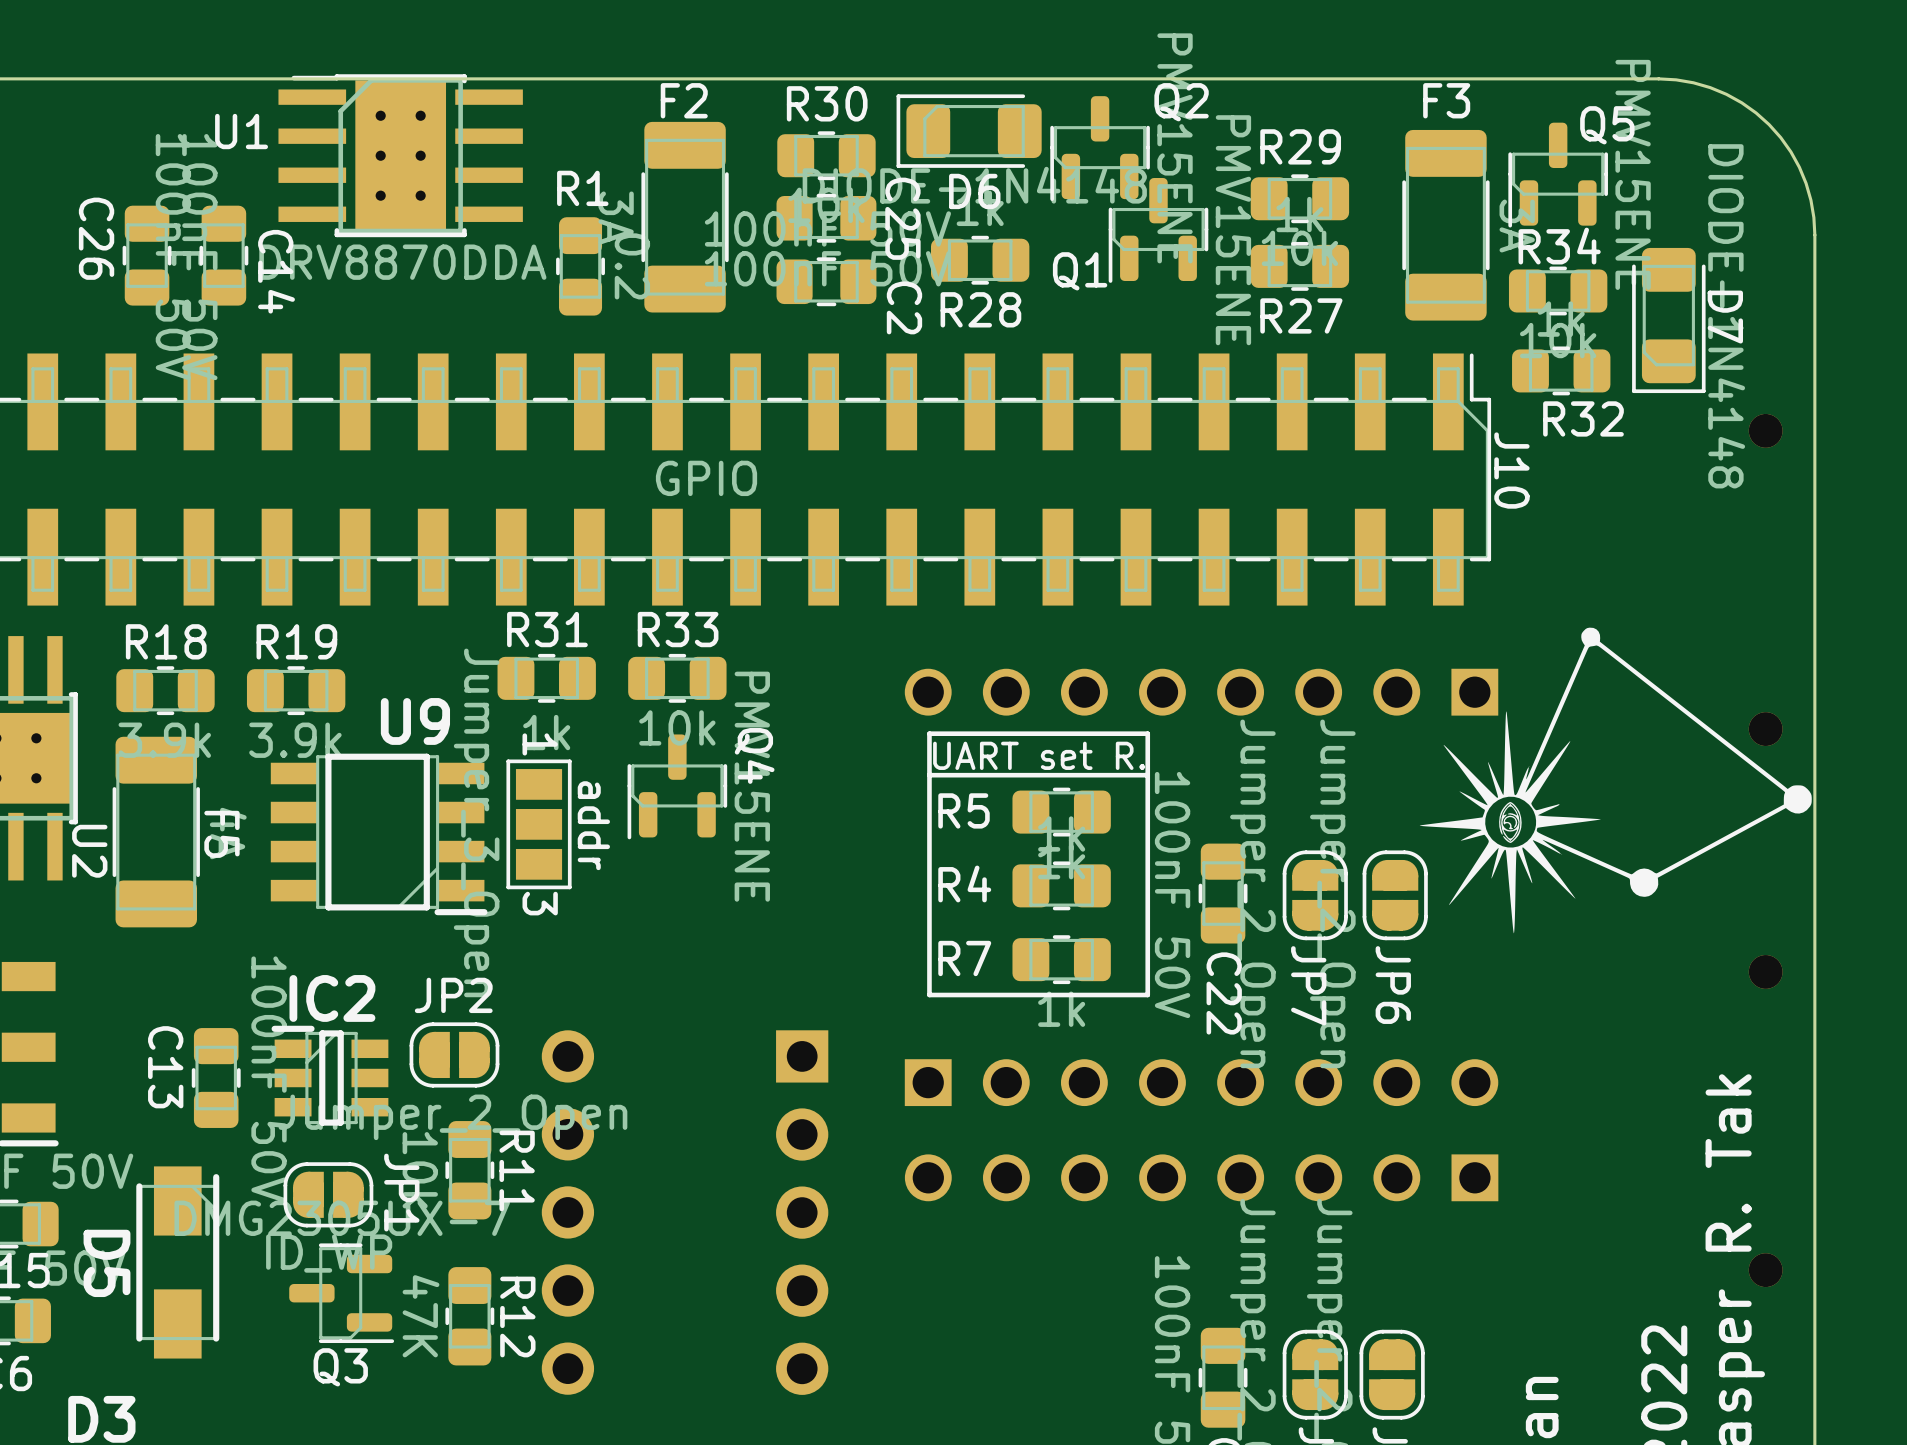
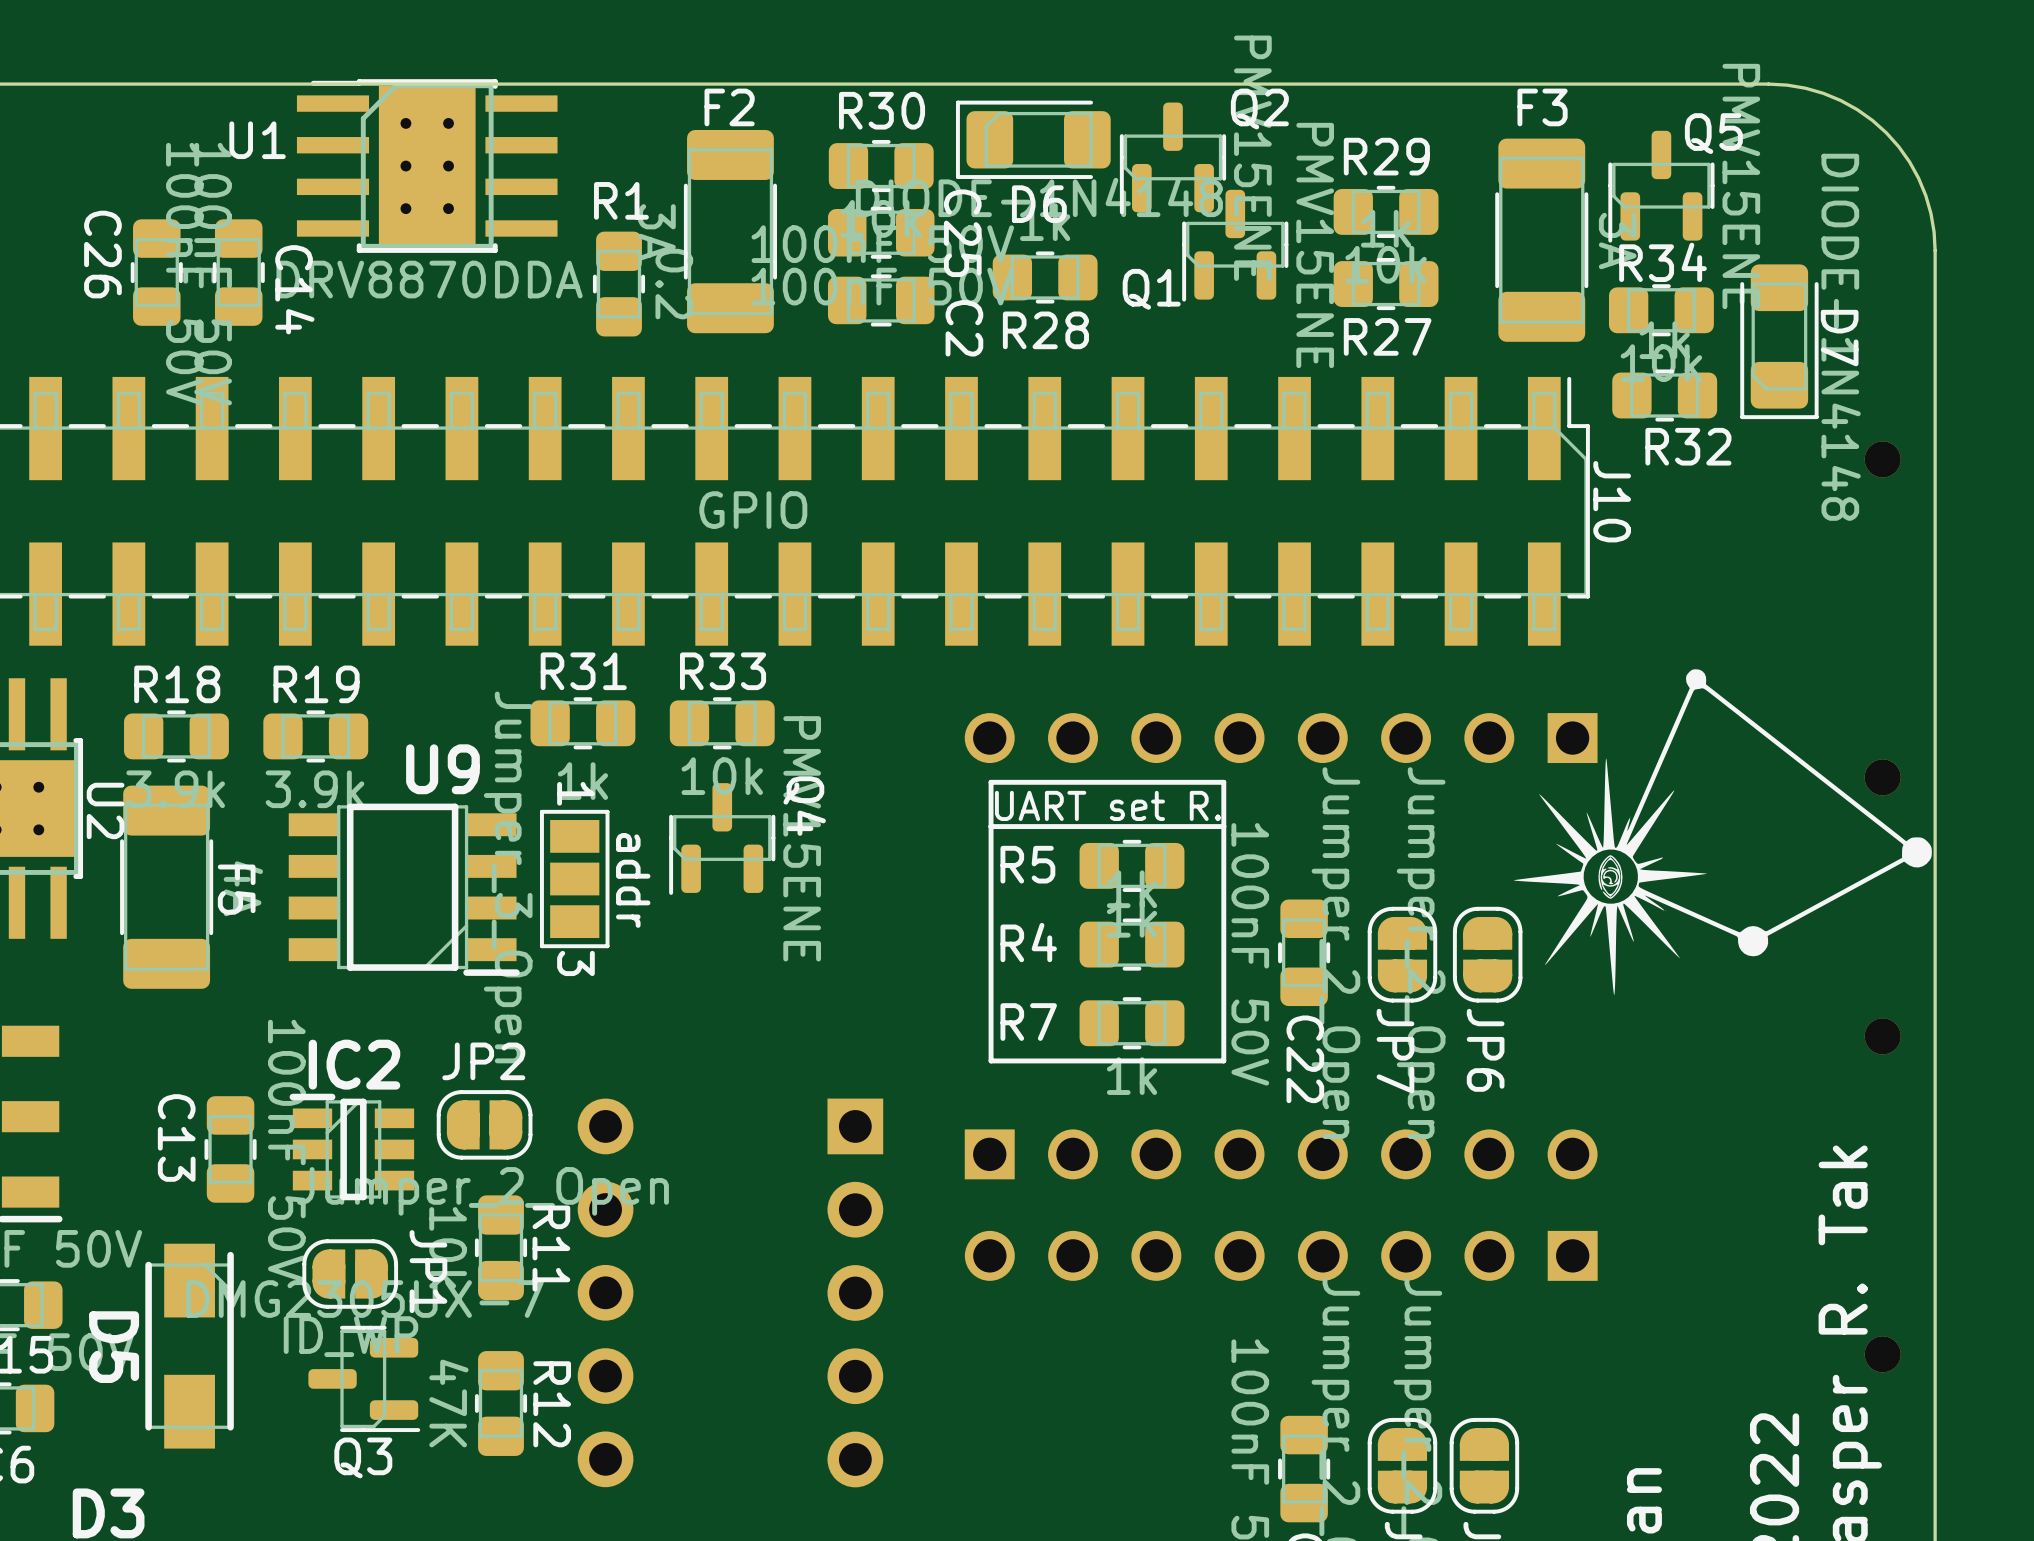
U2 name position: U2 (89, 851) -> U2 (105, 810)

